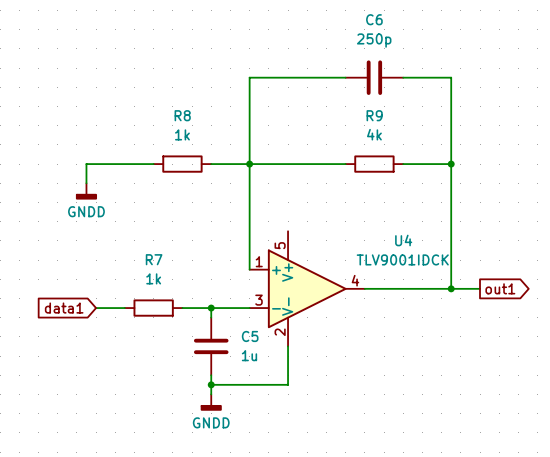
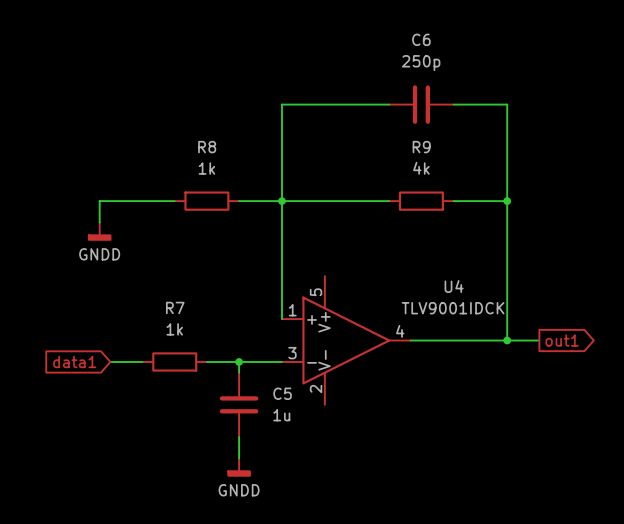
wire: (288, 346) (288, 384) (211, 384) -> none
junction: (211, 384) -> none

